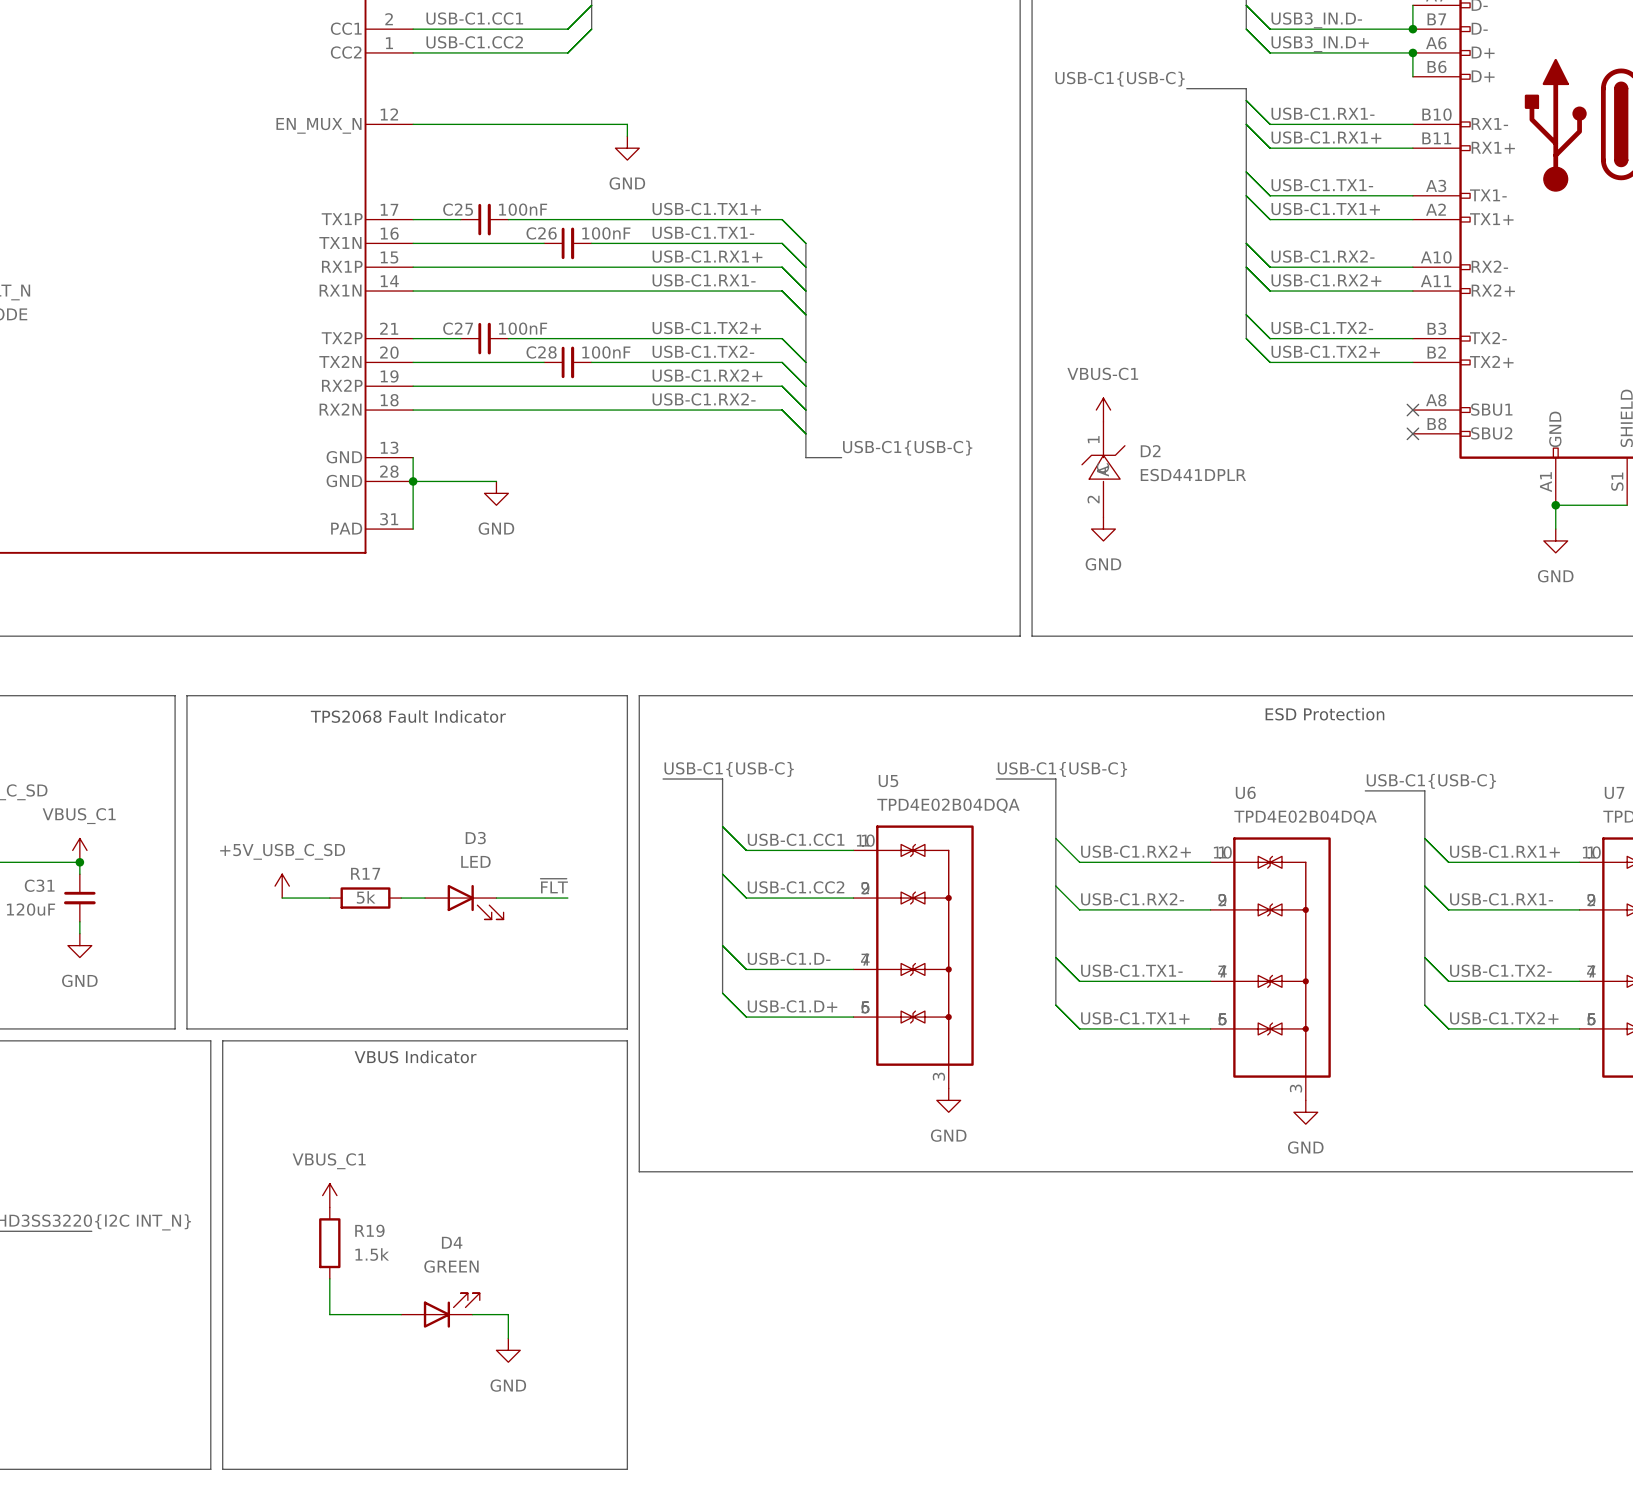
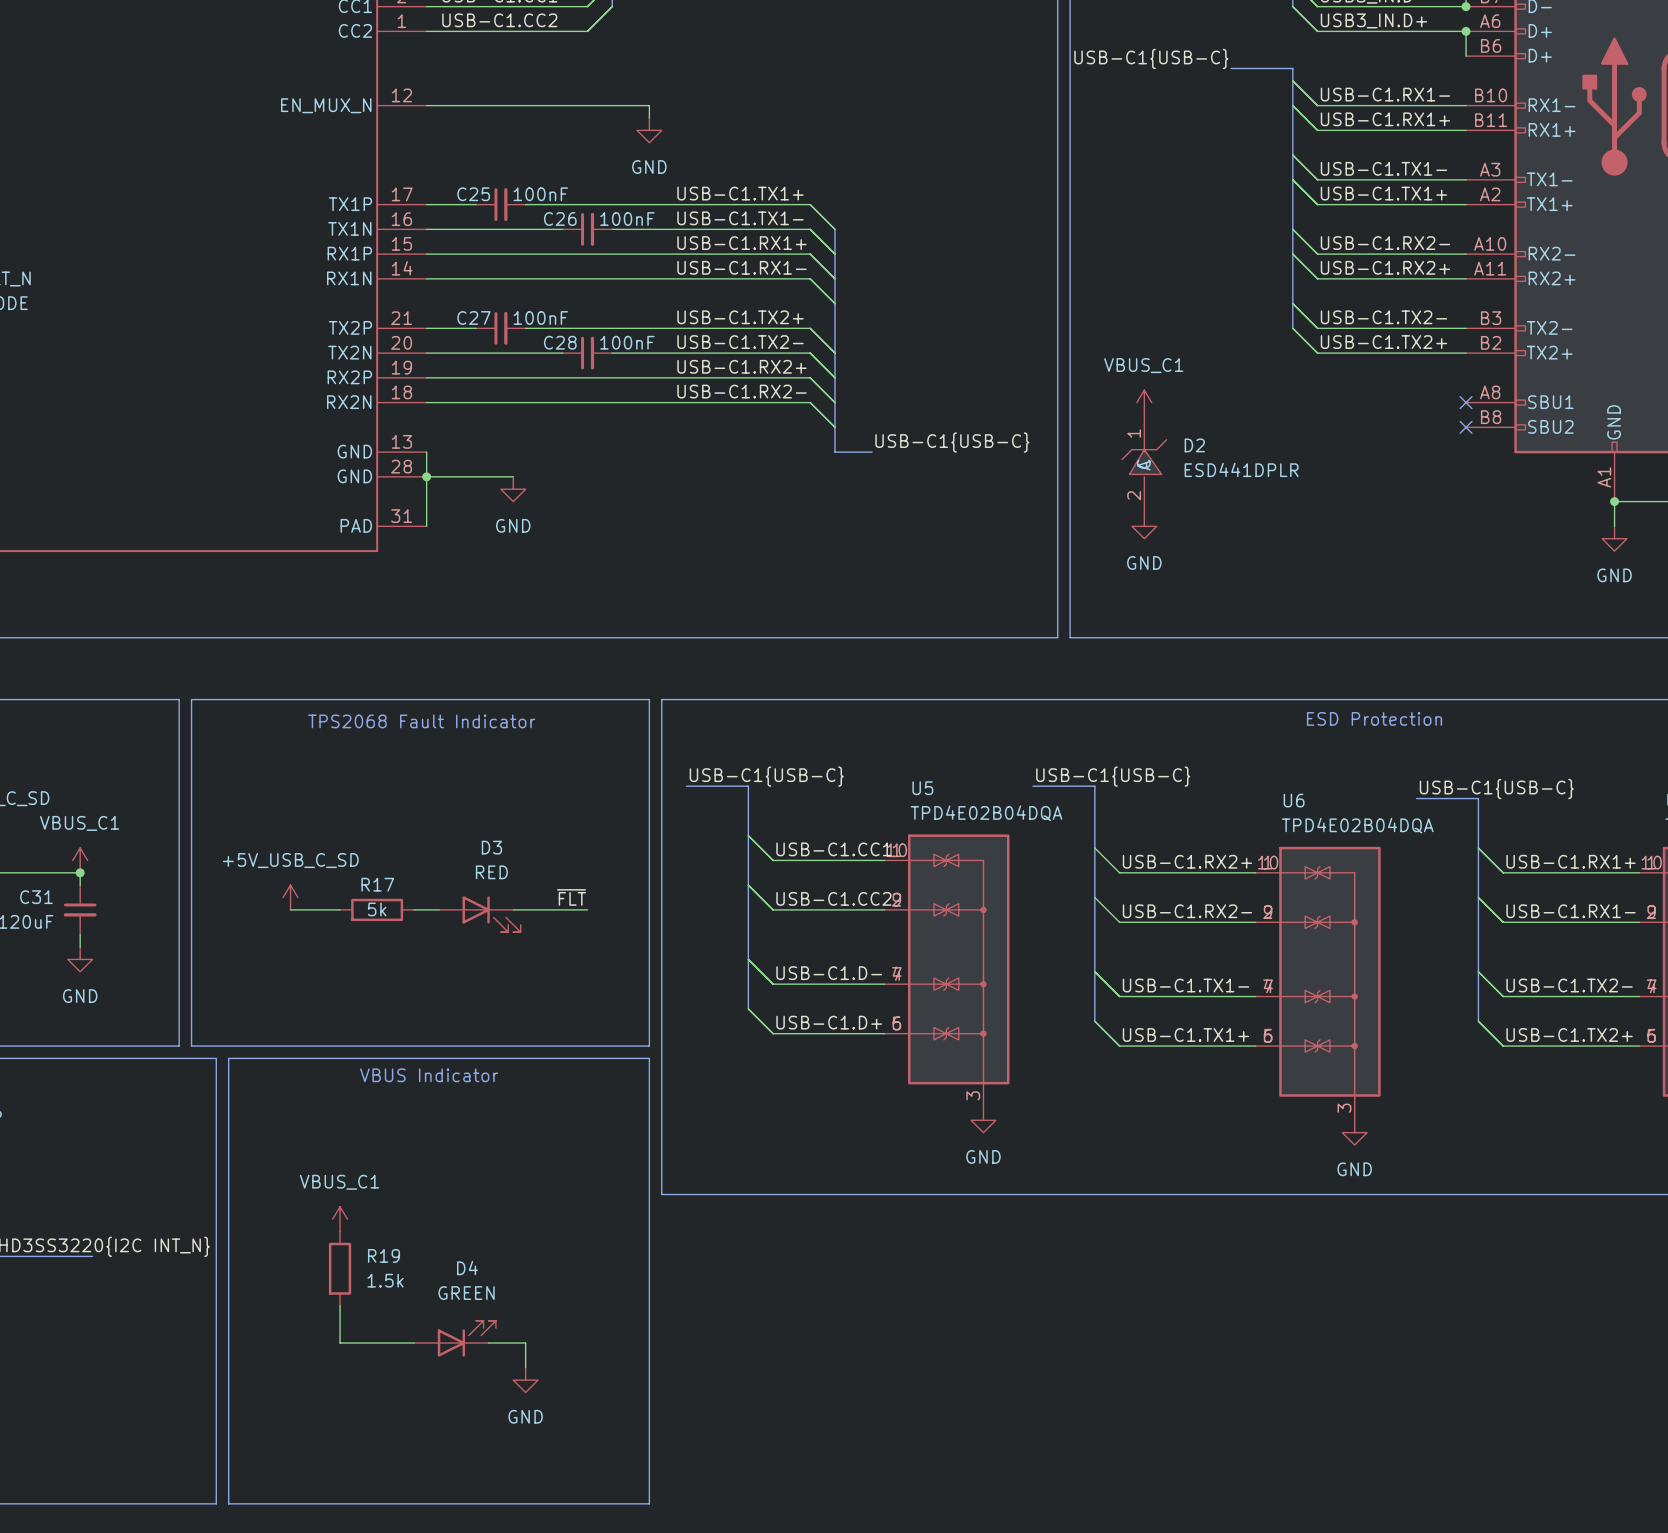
power symbol: VBUS-C1 (1103, 410) -> VBUS_C1 (1144, 402)
D3 value: LED (475, 861) -> RED (491, 872)

